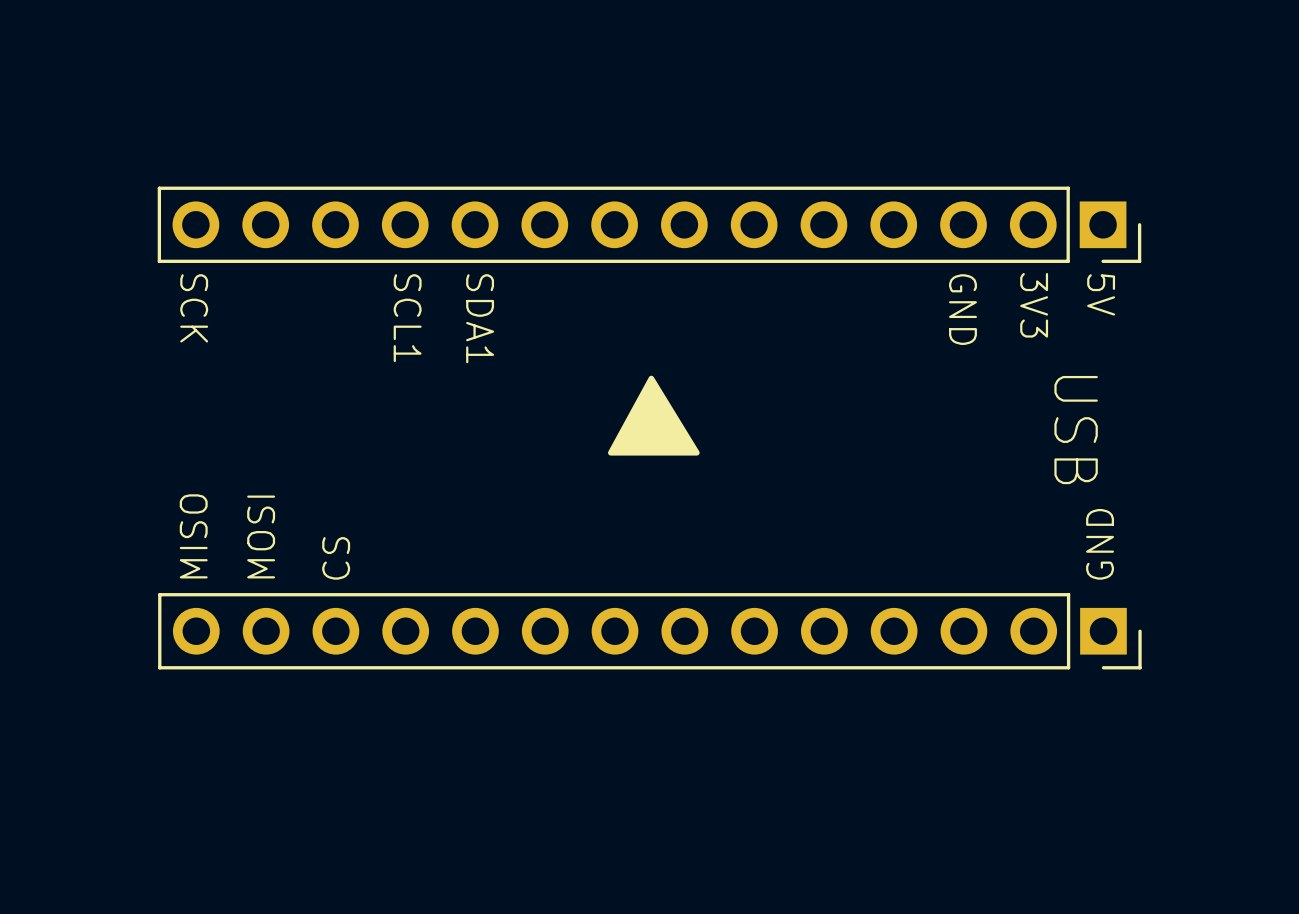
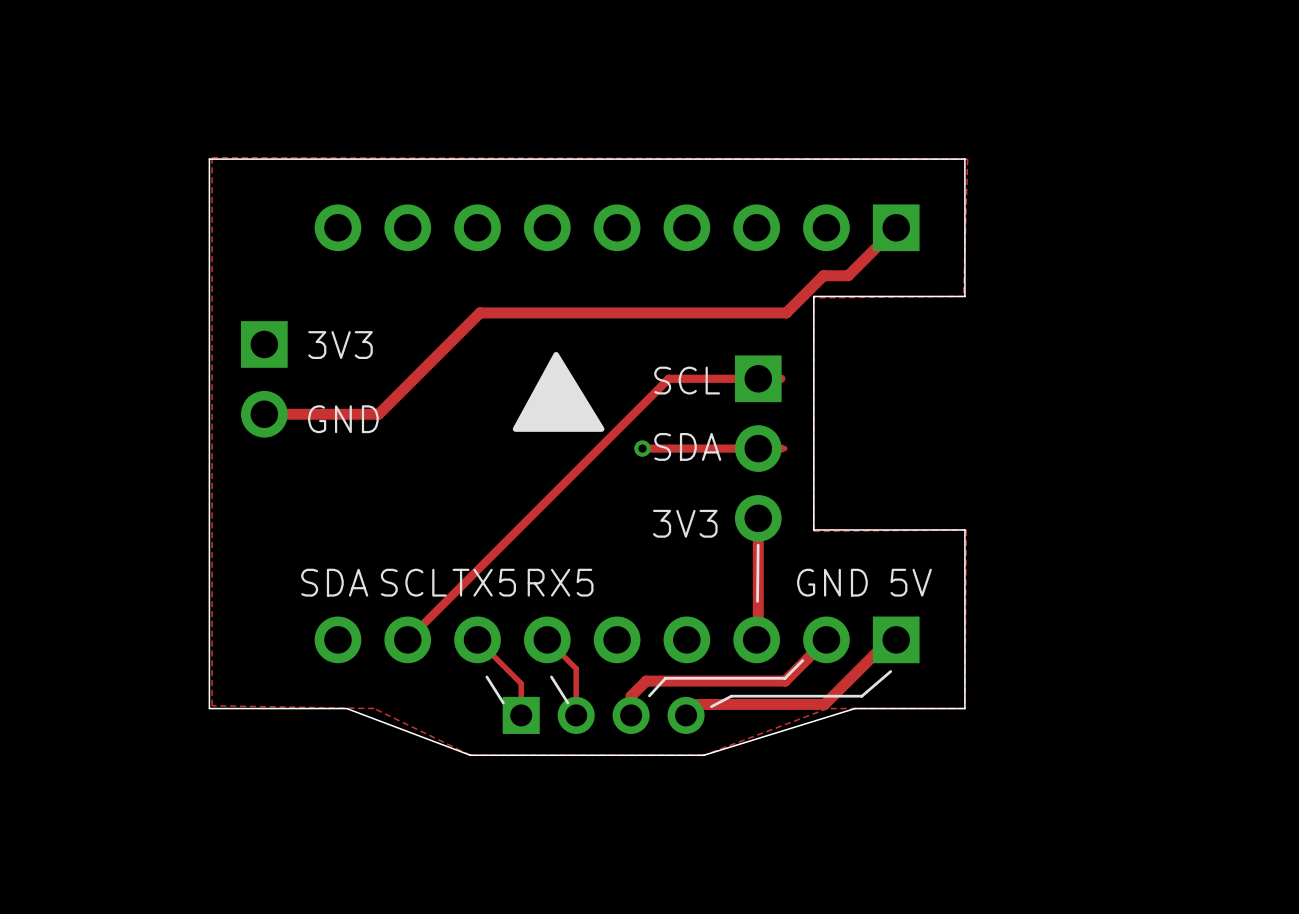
zone outline: none -> (212, 157) (967, 159) (963, 296) (813, 297) (813, 531) (966, 529) (964, 708) (827, 708) (703, 755) (470, 755) (374, 708) (212, 705) (212, 157)
board edge: none -> (209, 159) (964, 159) (964, 296) (813, 296) (813, 529) (964, 529) (964, 708) (855, 708) (703, 755) (470, 755) (346, 708) (209, 708) (209, 159)
part: (649, 224) -> none
part: none -> (617, 227)
track: none -> (896, 227) (848, 275) (823, 275) (786, 312) (480, 312) (378, 414) (287, 414)
text rotation: 0° (1101, 294) -> 90° counterclockwise (911, 582)
text position: 5V (1101, 294) -> 5V (911, 582)
text: 3V3 (1034, 305) -> none
text: SCK (194, 308) -> none
text: GND (962, 309) -> none
text: SCL1 (407, 318) -> none
text: SDA1 (480, 318) -> none
text: none -> 3V3 (340, 345)
track: none -> (781, 378) (668, 378) (407, 639)
part: none -> (264, 379)
text: none -> SCL (687, 380)
drawing position: (653, 415) -> (558, 391)
text: none -> GND (343, 419)
text: USB (1076, 430) -> none
text: none -> SDA (687, 446)
track: none -> (642, 448) (784, 448)
via: none -> (642, 448)
part: none -> (758, 448)
track: none -> (758, 518) (758, 638)
text: none -> 3V3 (685, 523)
text: MISO (193, 536) -> none
text: MOSI (261, 536) -> SDA (334, 582)
text: GND (1100, 544) -> none
line: none -> (758, 545) (757, 601)
text: CS (336, 558) -> SCL (413, 582)
text: none -> TX5 (484, 582)
text: none -> RX5 (560, 582)
text: none -> GND (832, 582)
part: (649, 631) -> none
track: none -> (477, 639) (521, 683) (521, 715)
track: none -> (547, 639) (576, 668) (576, 715)
part: none -> (617, 639)
track: none -> (826, 639) (785, 681) (646, 681) (631, 696) (631, 715)
track: none -> (889, 639) (824, 704) (697, 704) (686, 715)
line: none -> (802, 660) (784, 678) (665, 678) (649, 695)
line: none -> (890, 671) (861, 696) (731, 696) (711, 706)
line: none -> (486, 676) (503, 703)
line: none -> (551, 676) (567, 703)
part: none -> (603, 715)

